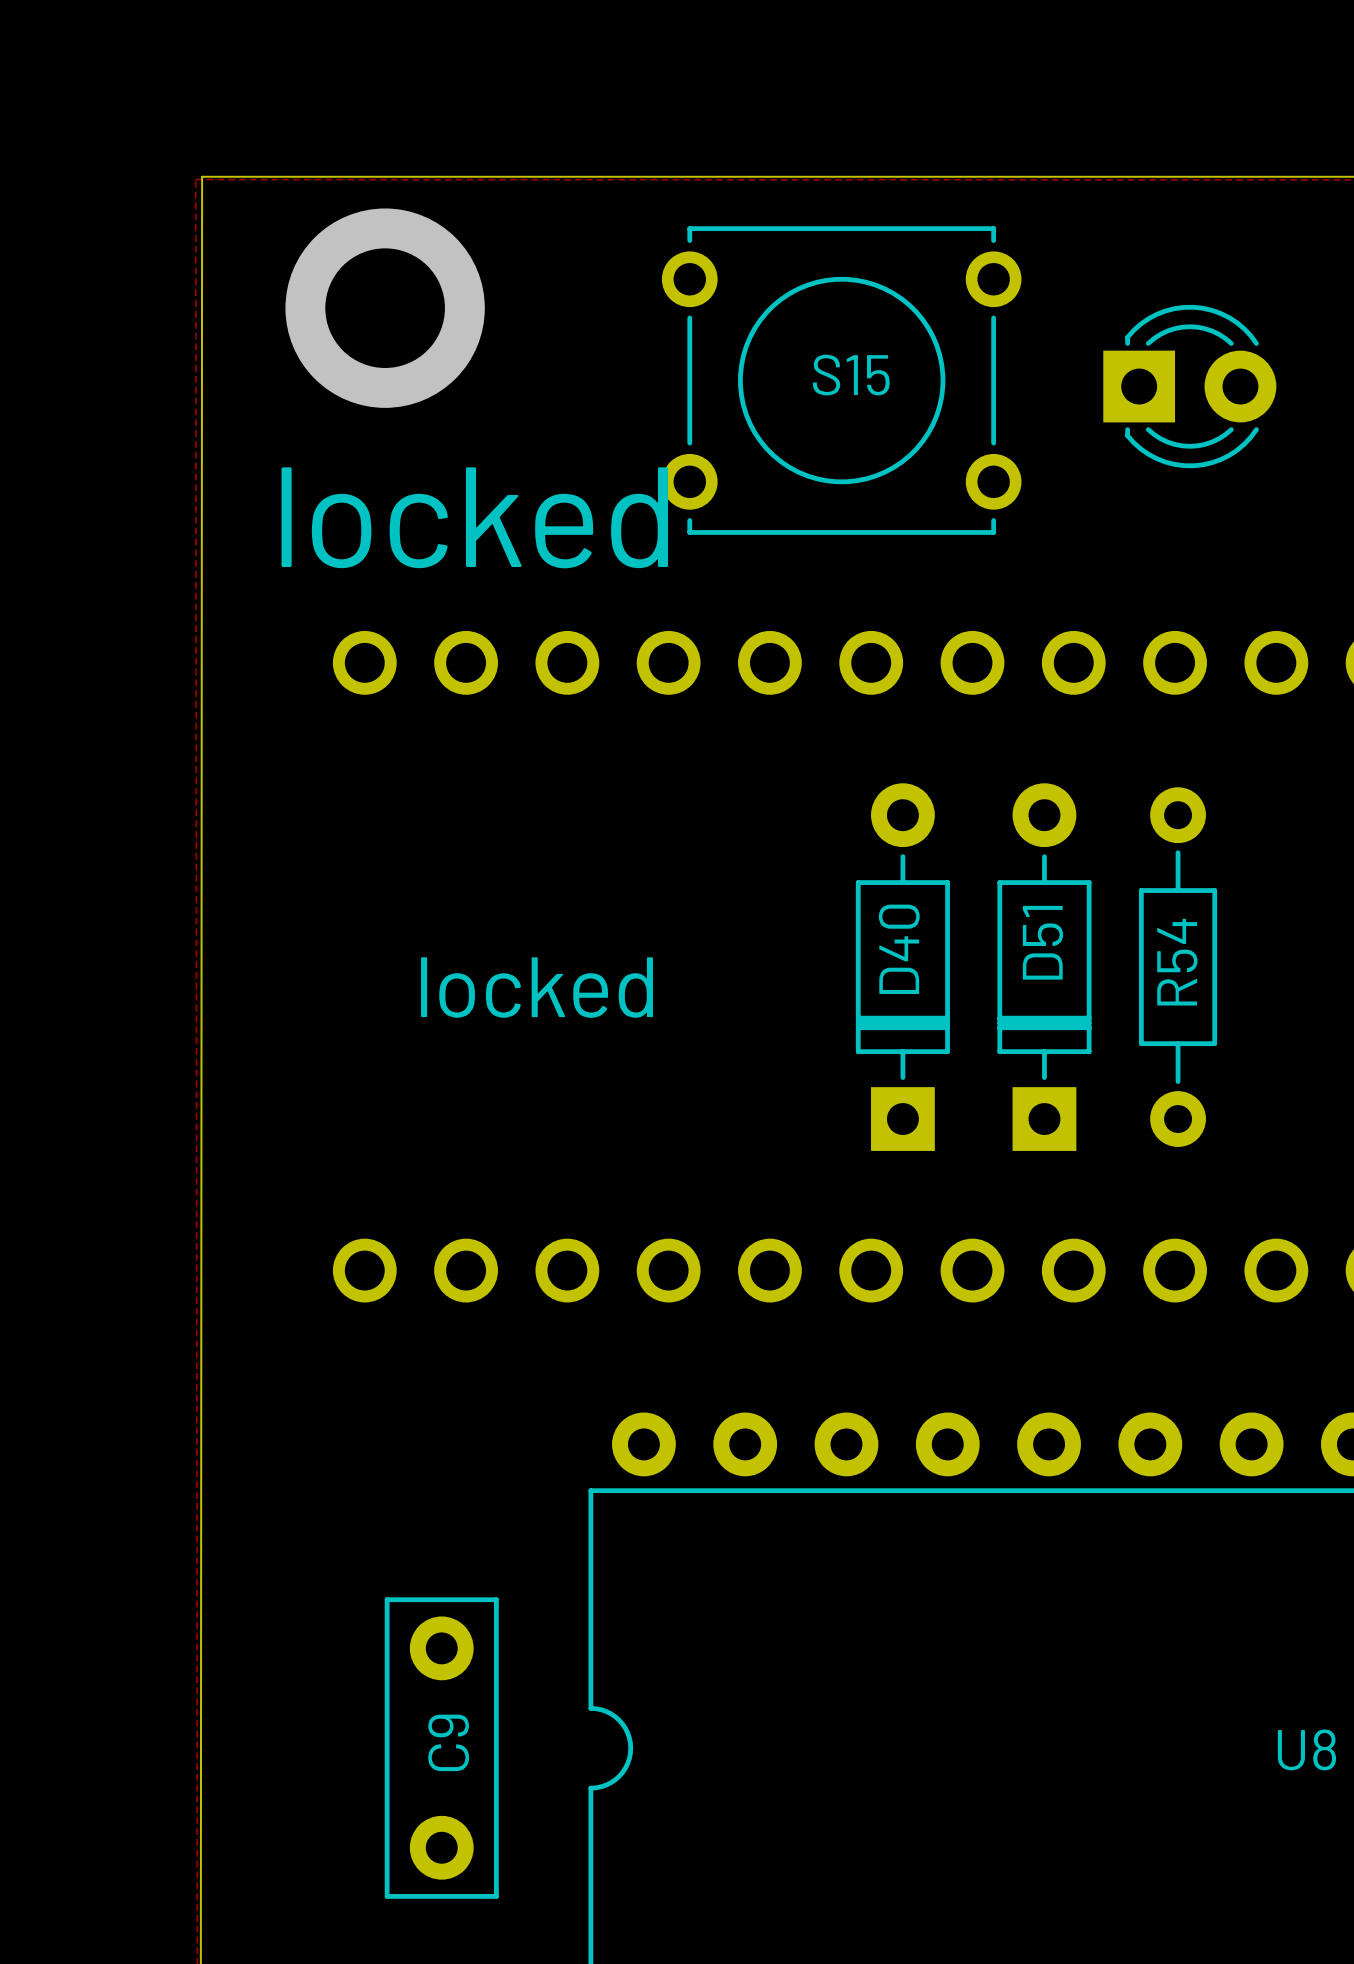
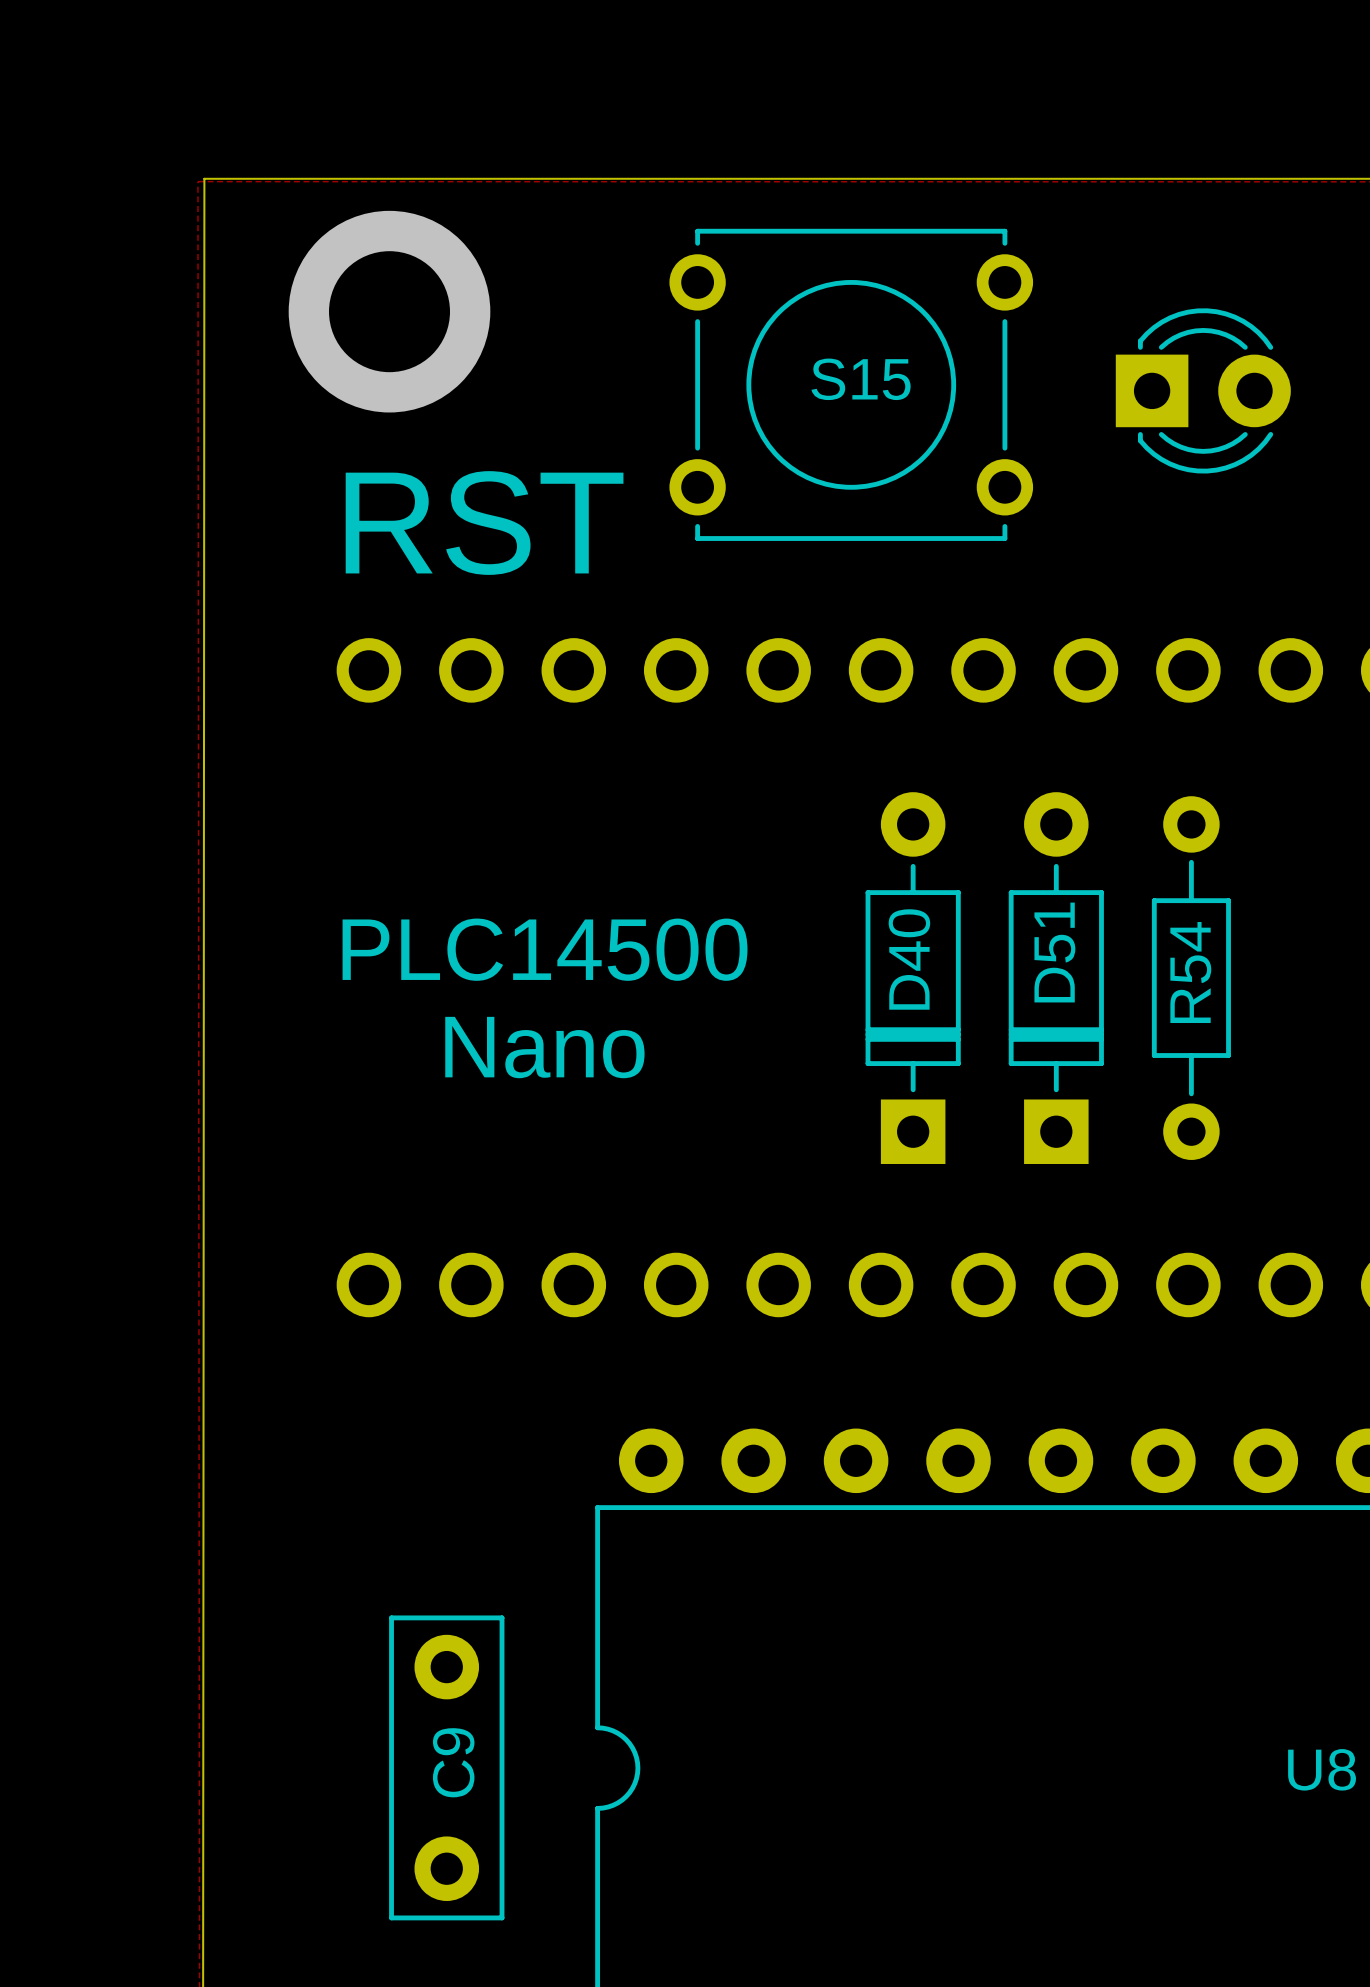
text: locked (474, 517) -> RST (484, 523)
text: none -> PLC14500 (545, 949)
text: locked (537, 987) -> none
text: none -> Nano (544, 1047)

